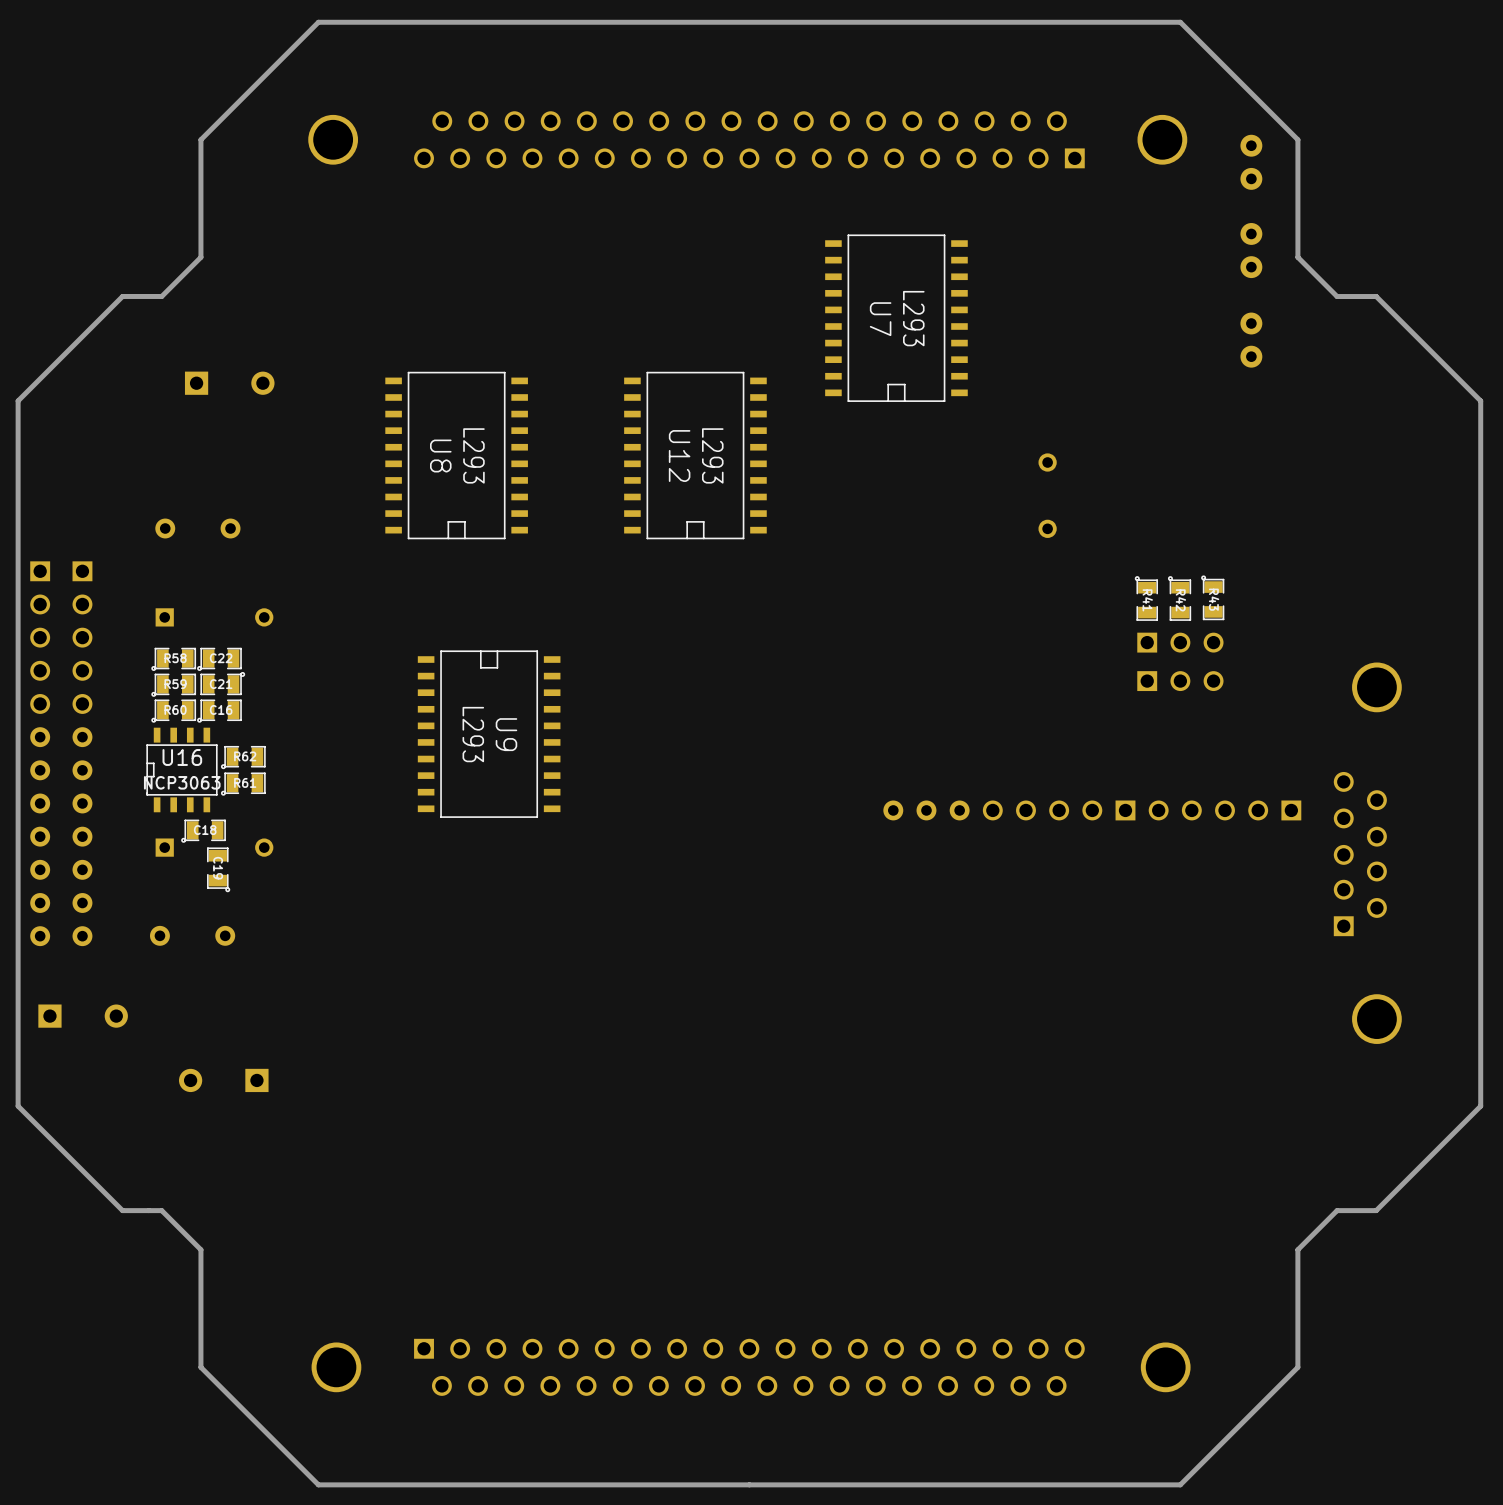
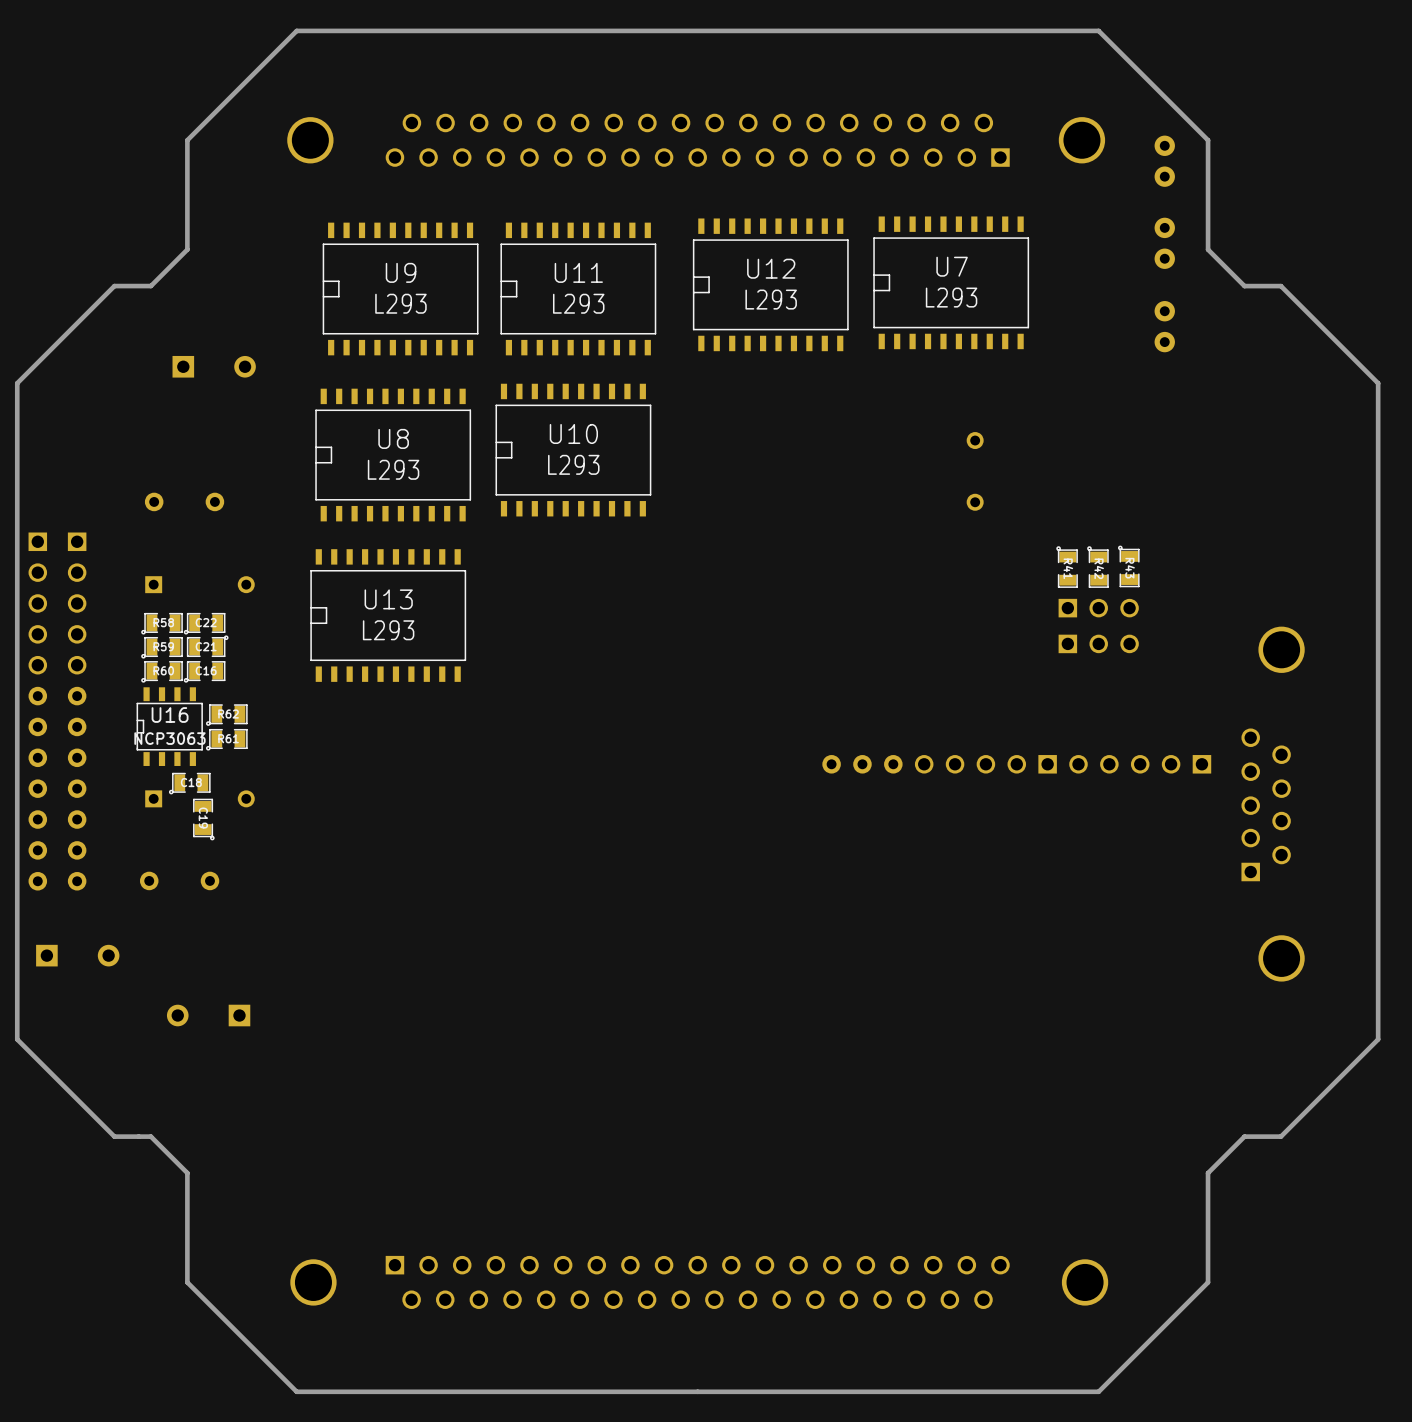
U11: none -> L293 (578, 288)
U7 rotation: 0° (896, 318) -> 90° clockwise (951, 282)
U7 position: (896, 318) -> (951, 282)
U8 rotation: 0° (456, 455) -> 90° clockwise (393, 455)
U12 rotation: 0° (695, 455) -> 90° clockwise (770, 284)
U12 position: (695, 455) -> (770, 284)
U10: none -> L293 (573, 450)
U13: none -> L293 (388, 615)
U9 rotation: 0° (489, 734) -> 90° counterclockwise (400, 288)
U9 position: (489, 734) -> (400, 288)

